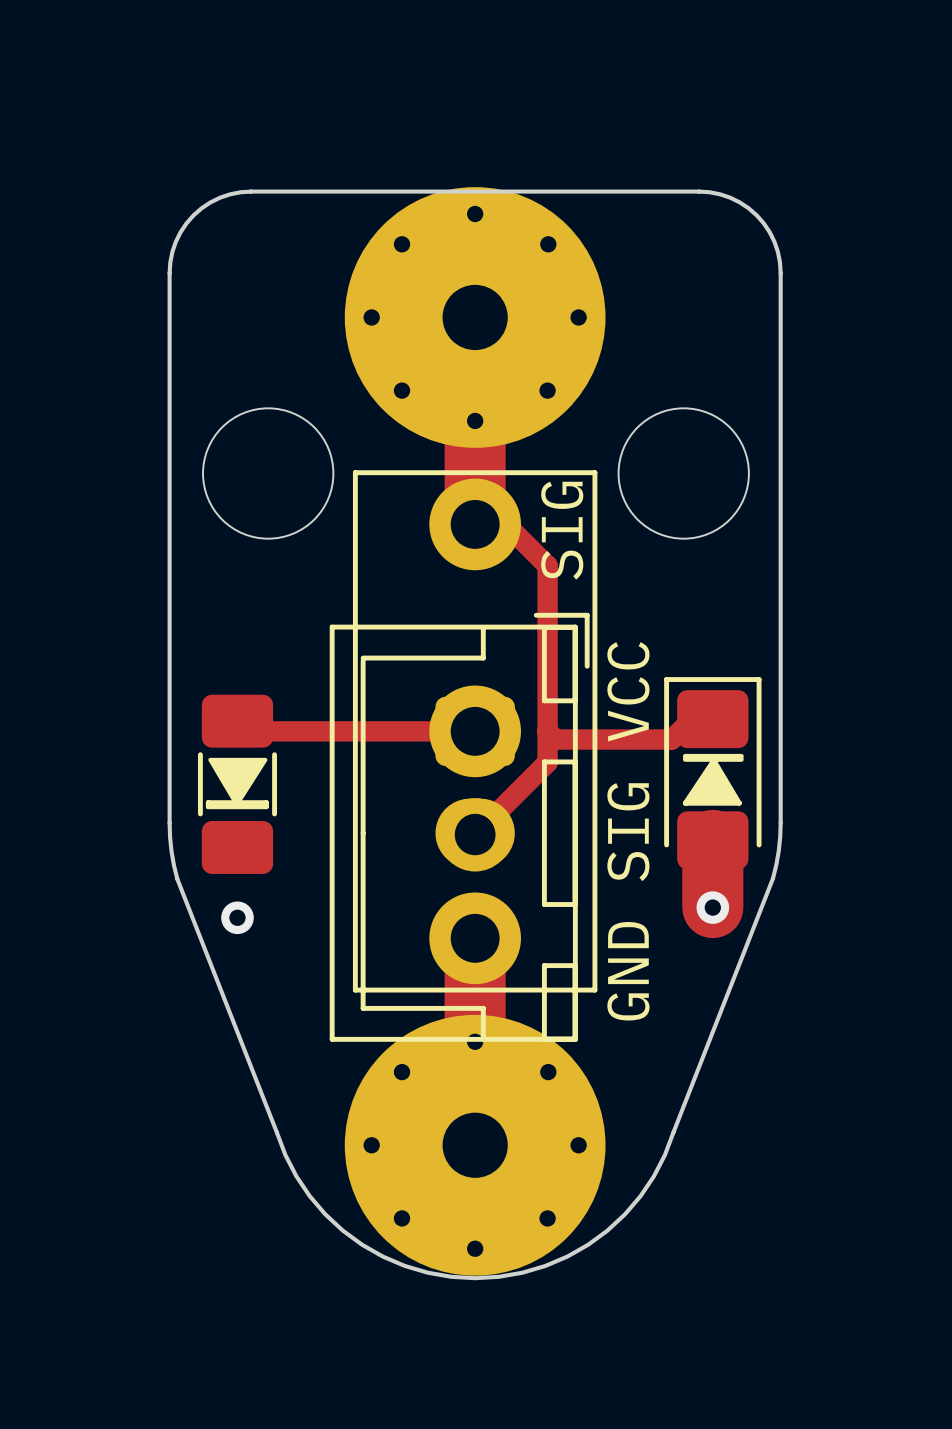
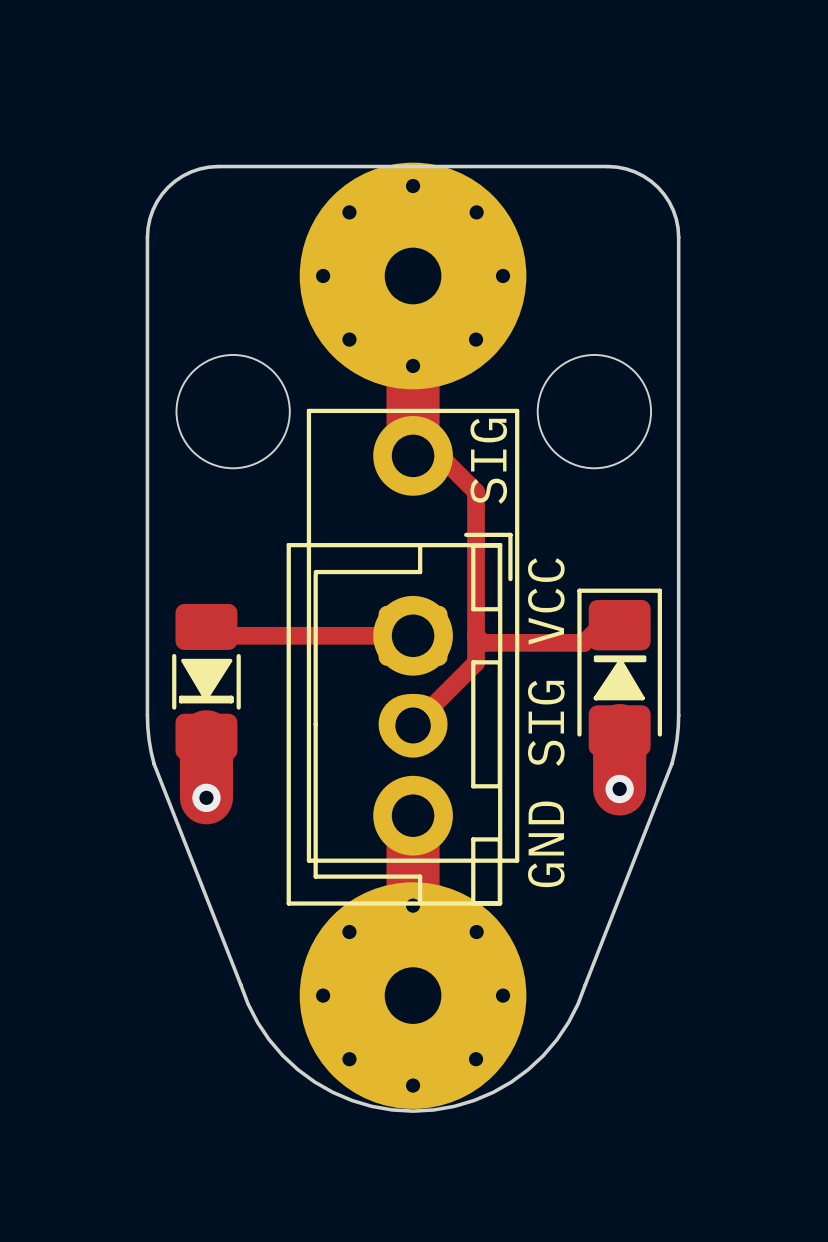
track: none -> (206, 736) (206, 797)

